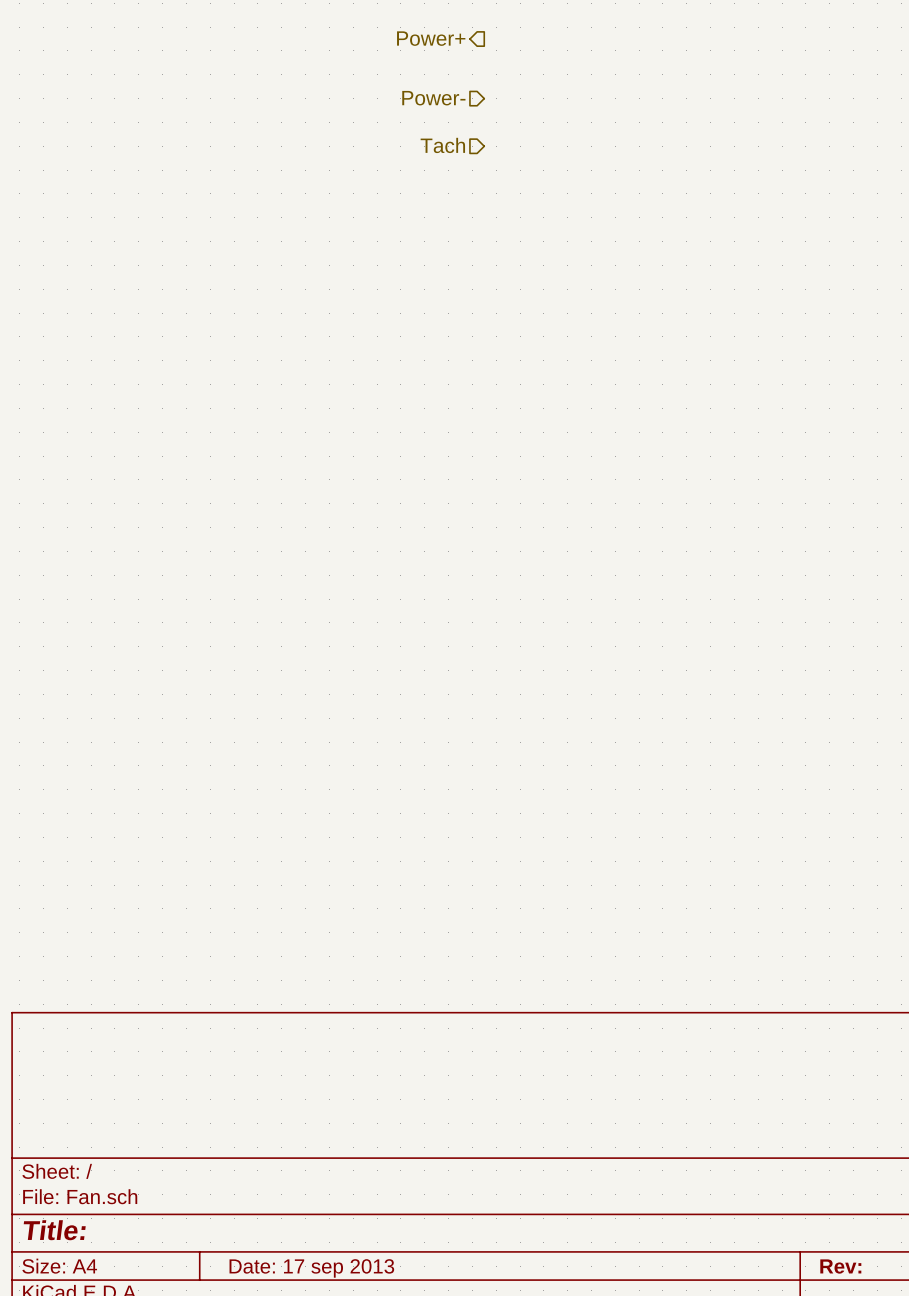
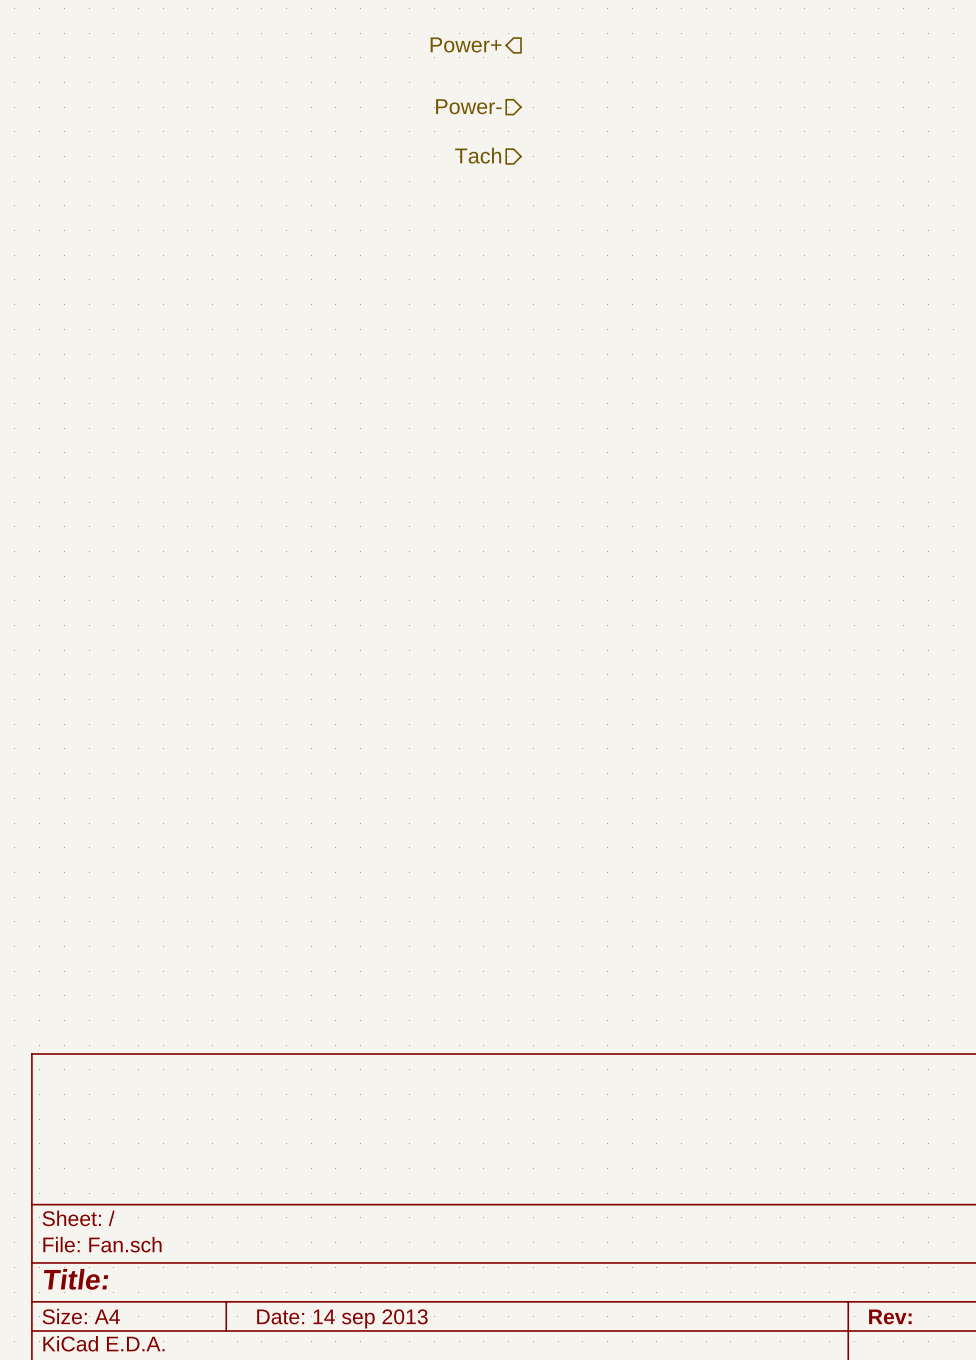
title block: Date: 17 sep 2013 (311, 1268) -> Date: 14 sep 2013 (342, 1318)

